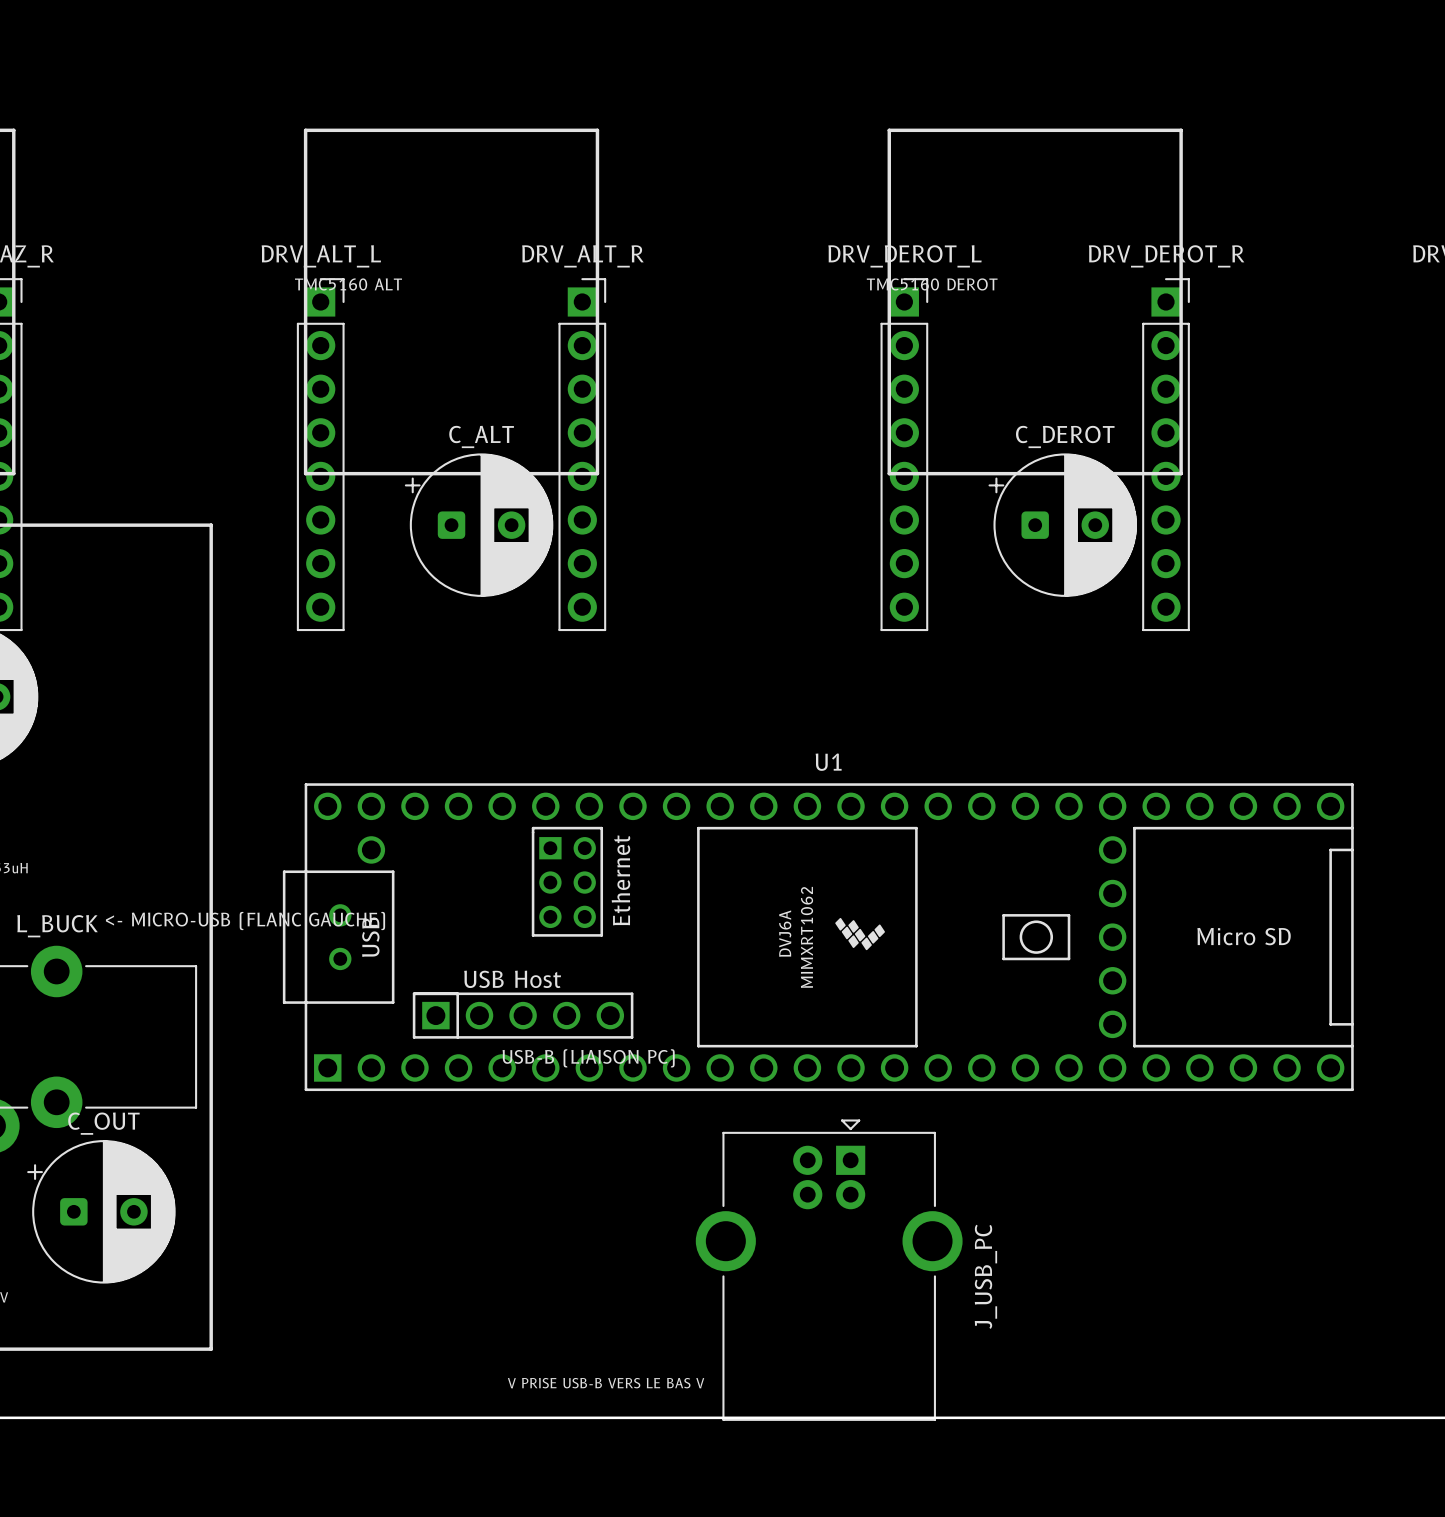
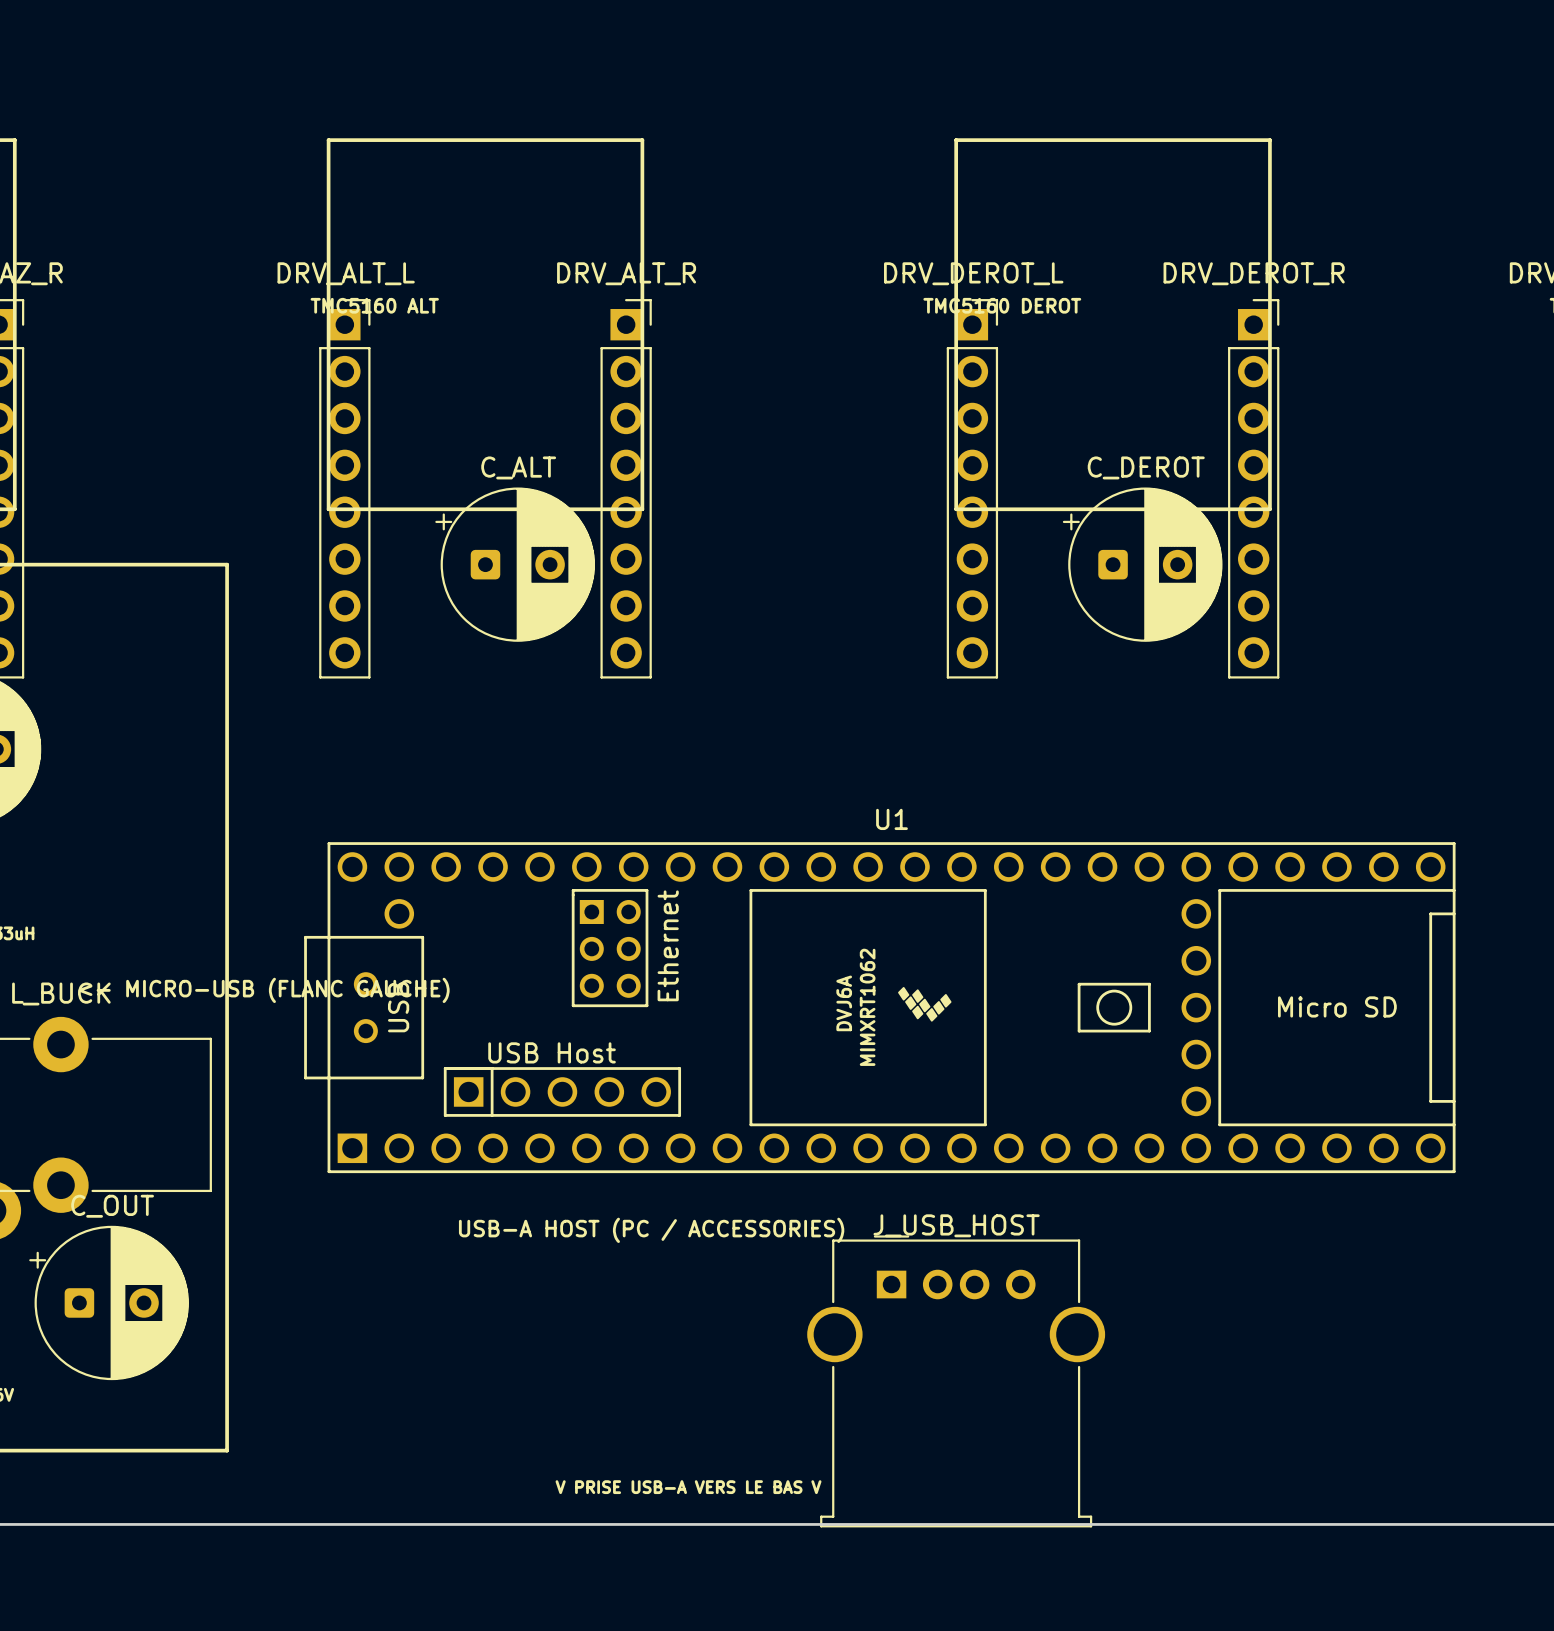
text: USB-B (LIAISON PC) (588, 1058) -> none
text: none -> USB-A HOST (PC / ACCESSORIES) (651, 1230)
J_USB_PC: (829, 1270) -> none
J_USB_HOST: none -> (956, 1381)
text: V PRISE USB-B VERS LE BAS V (606, 1383) -> V PRISE USB-A VERS LE BAS V (688, 1487)

